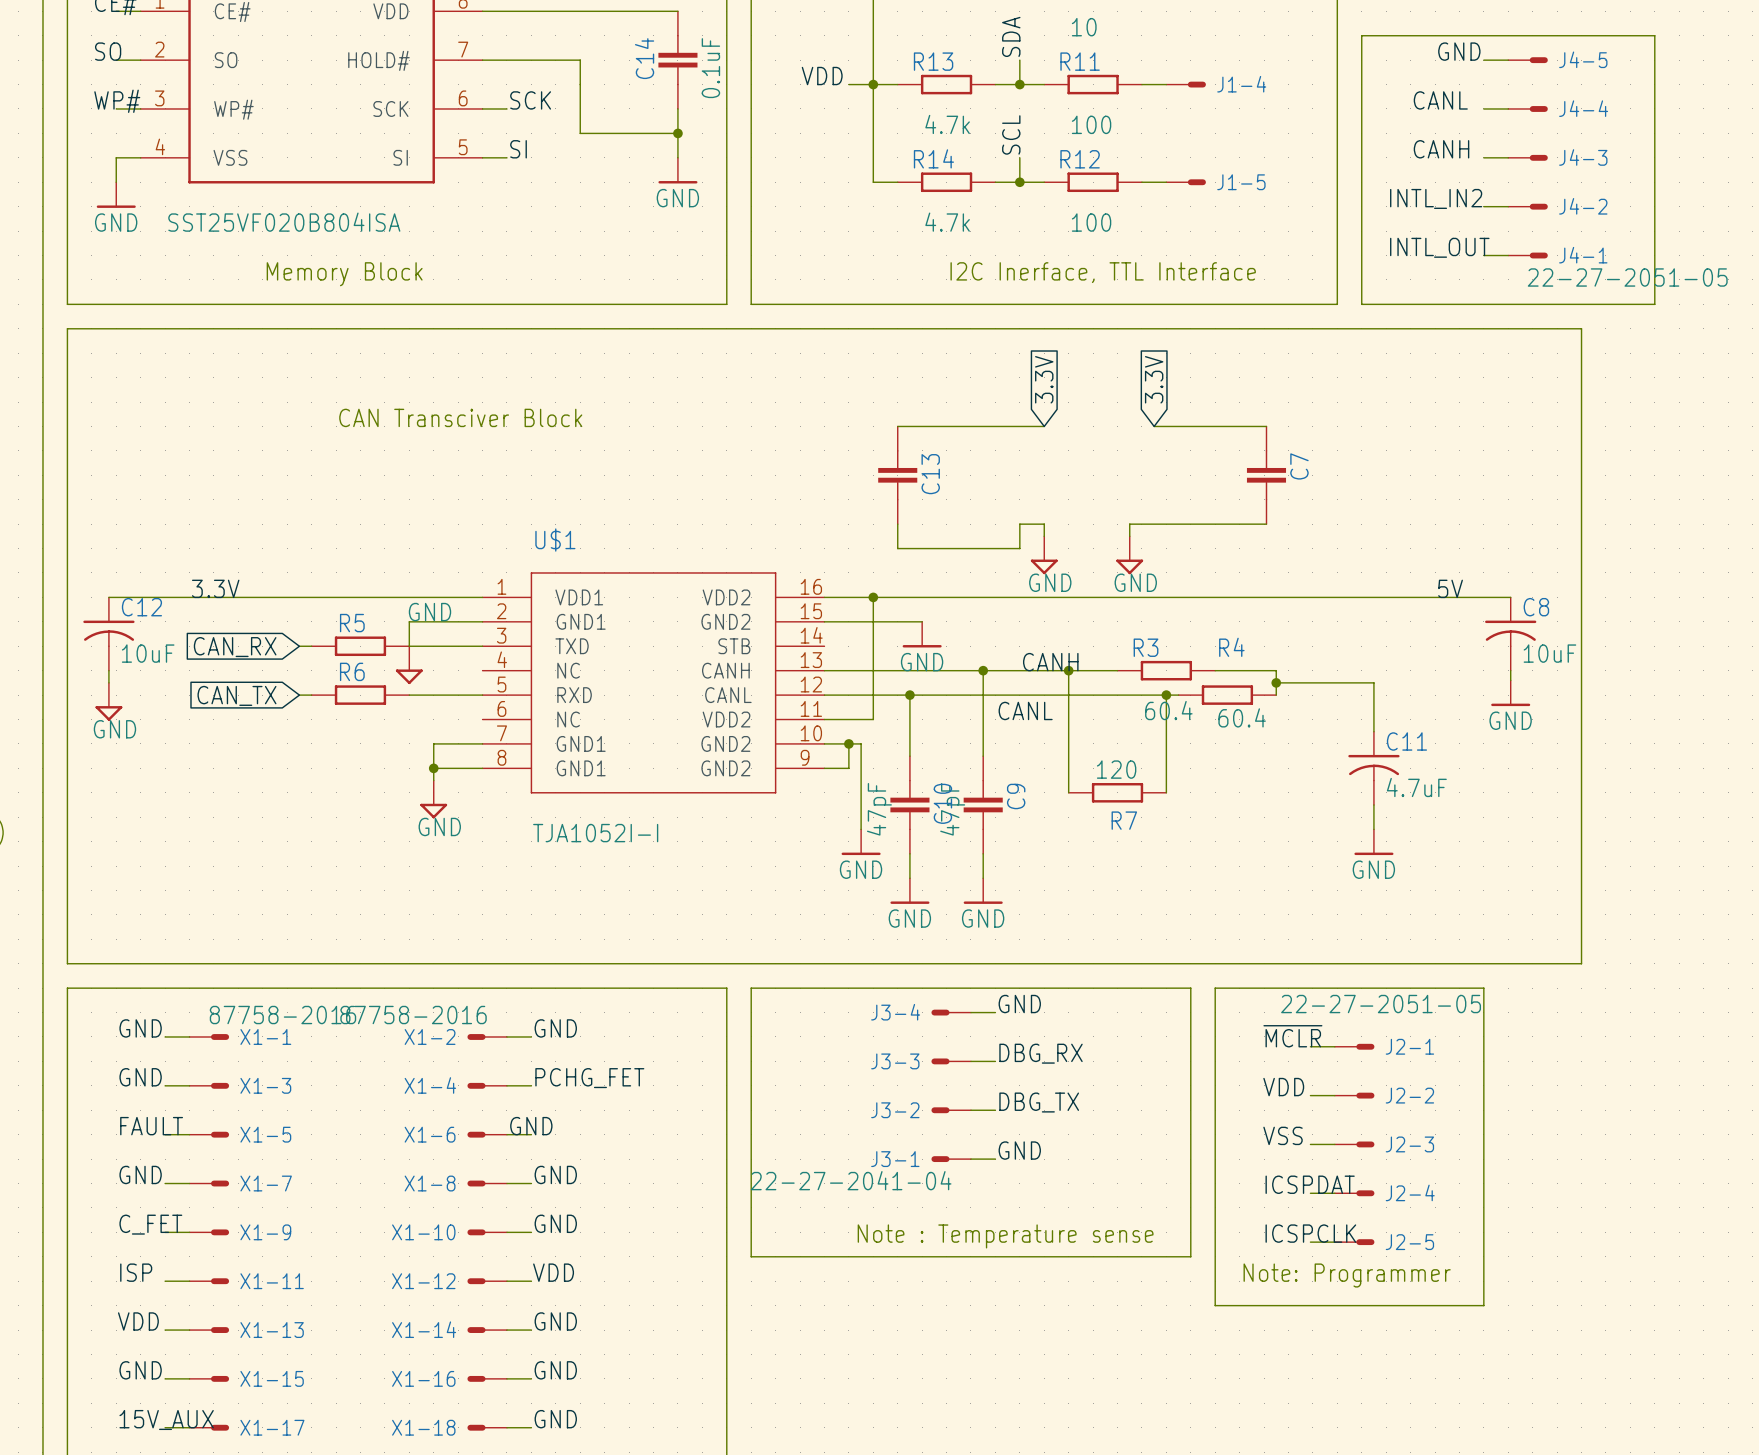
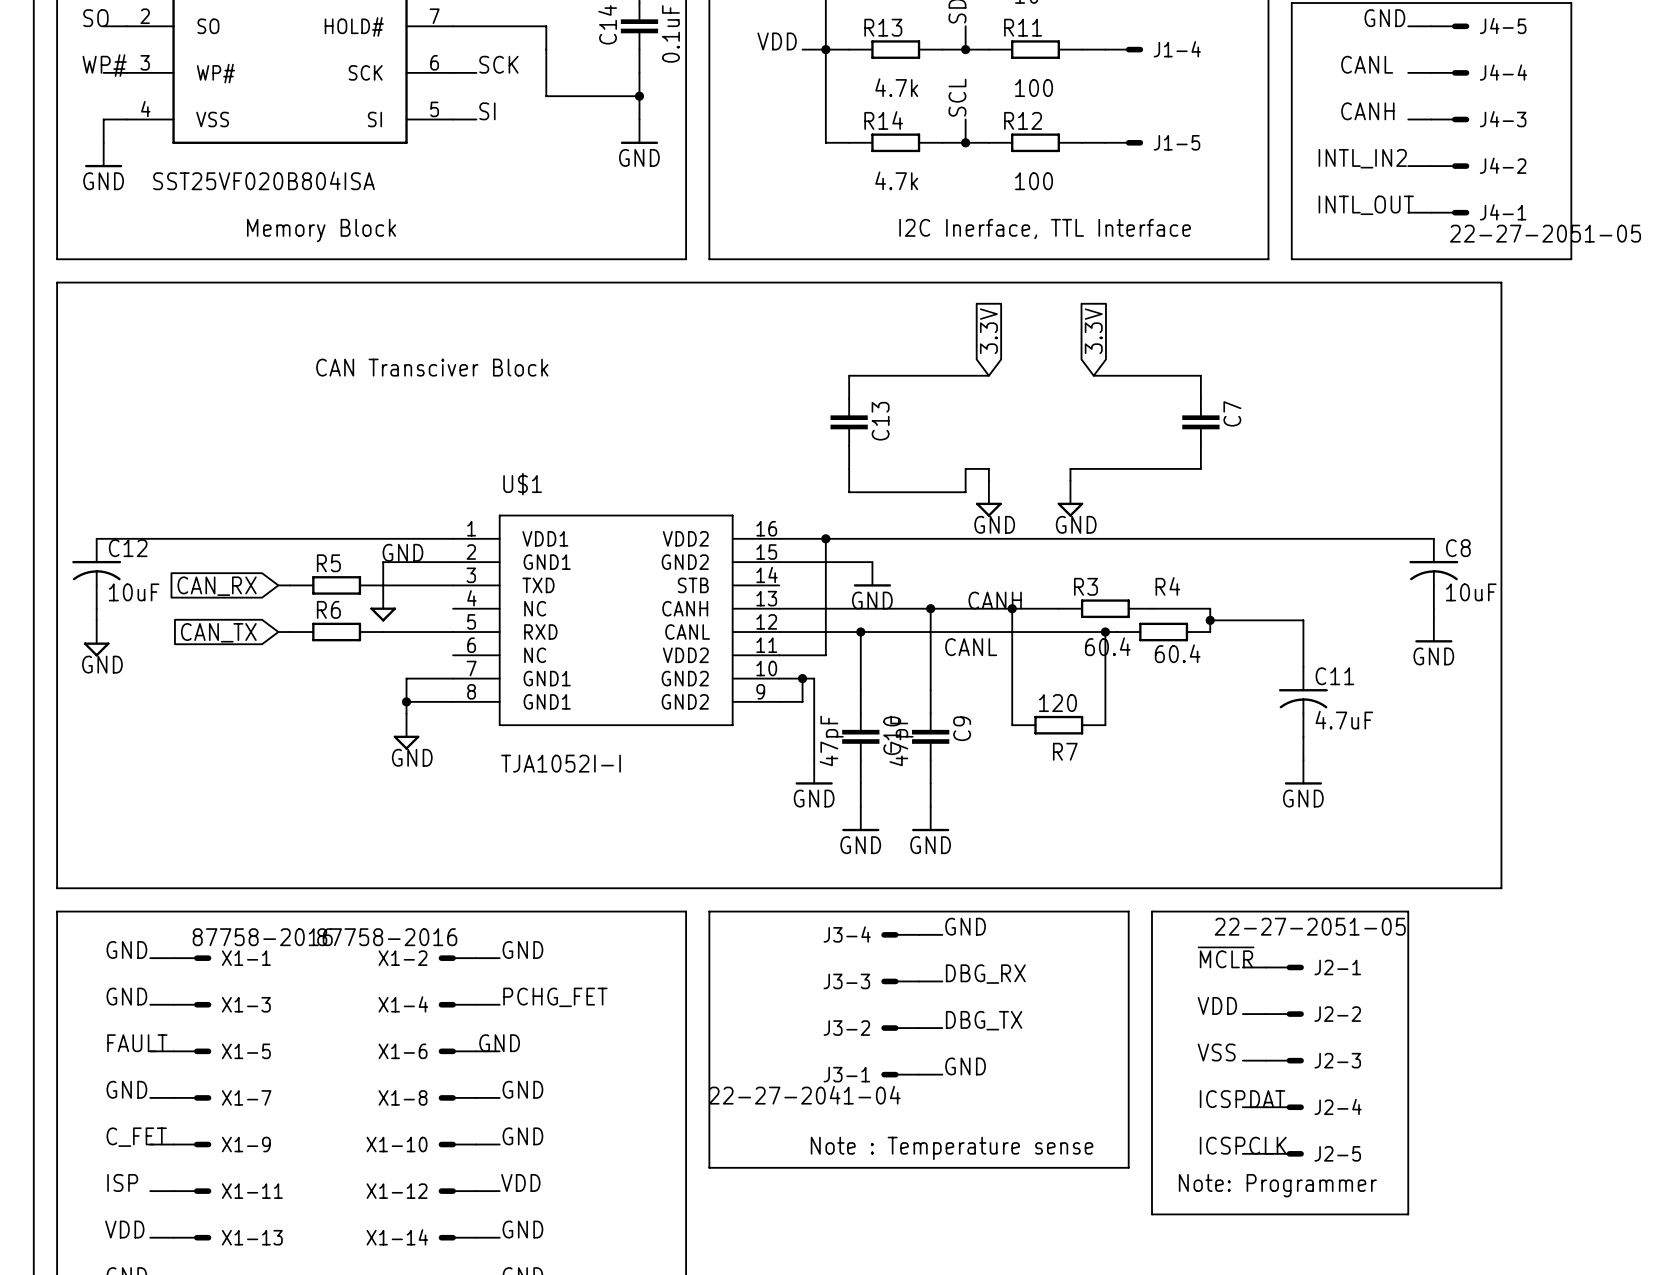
label: 3.3V (215, 588) -> none
label: 5V (1450, 588) -> none

